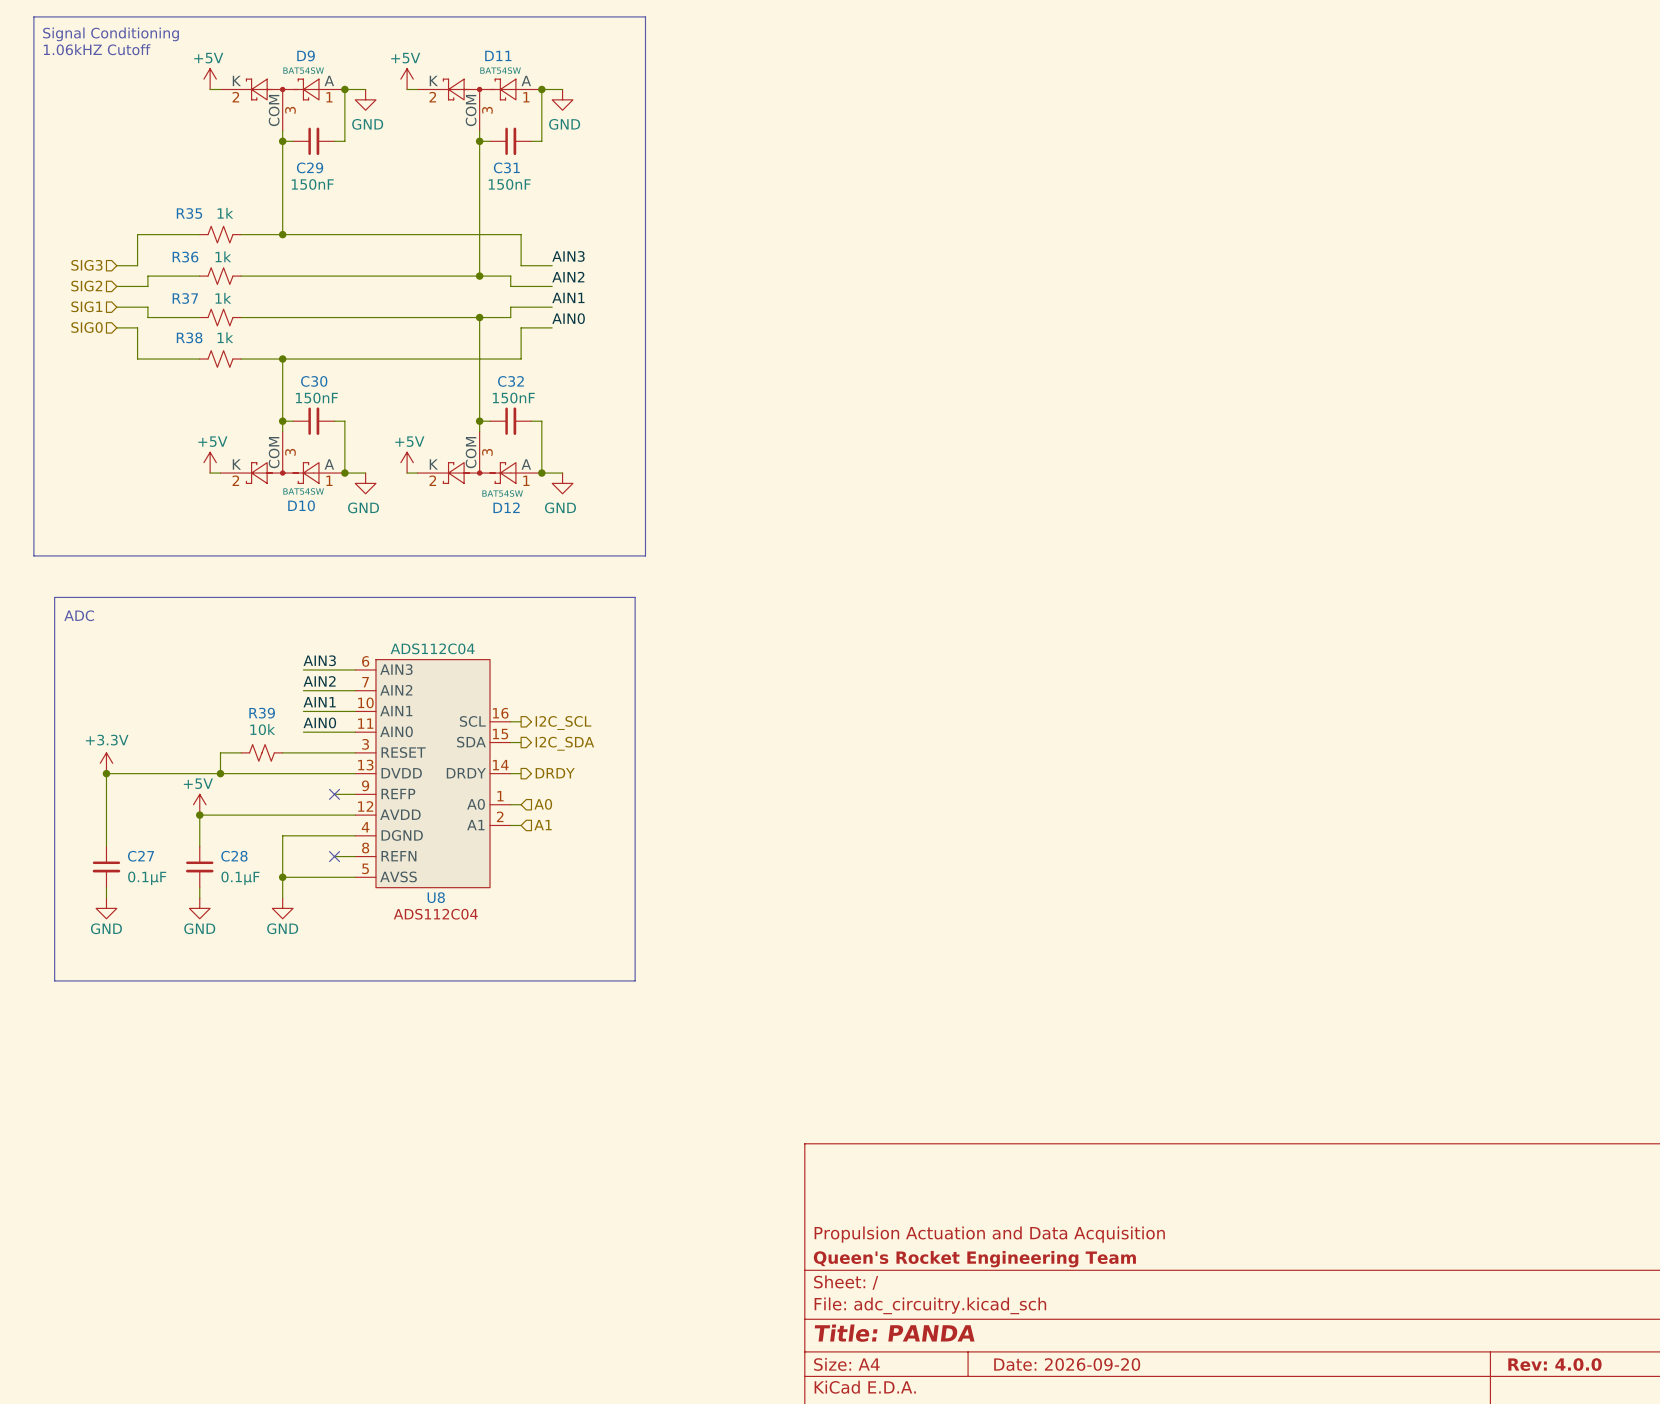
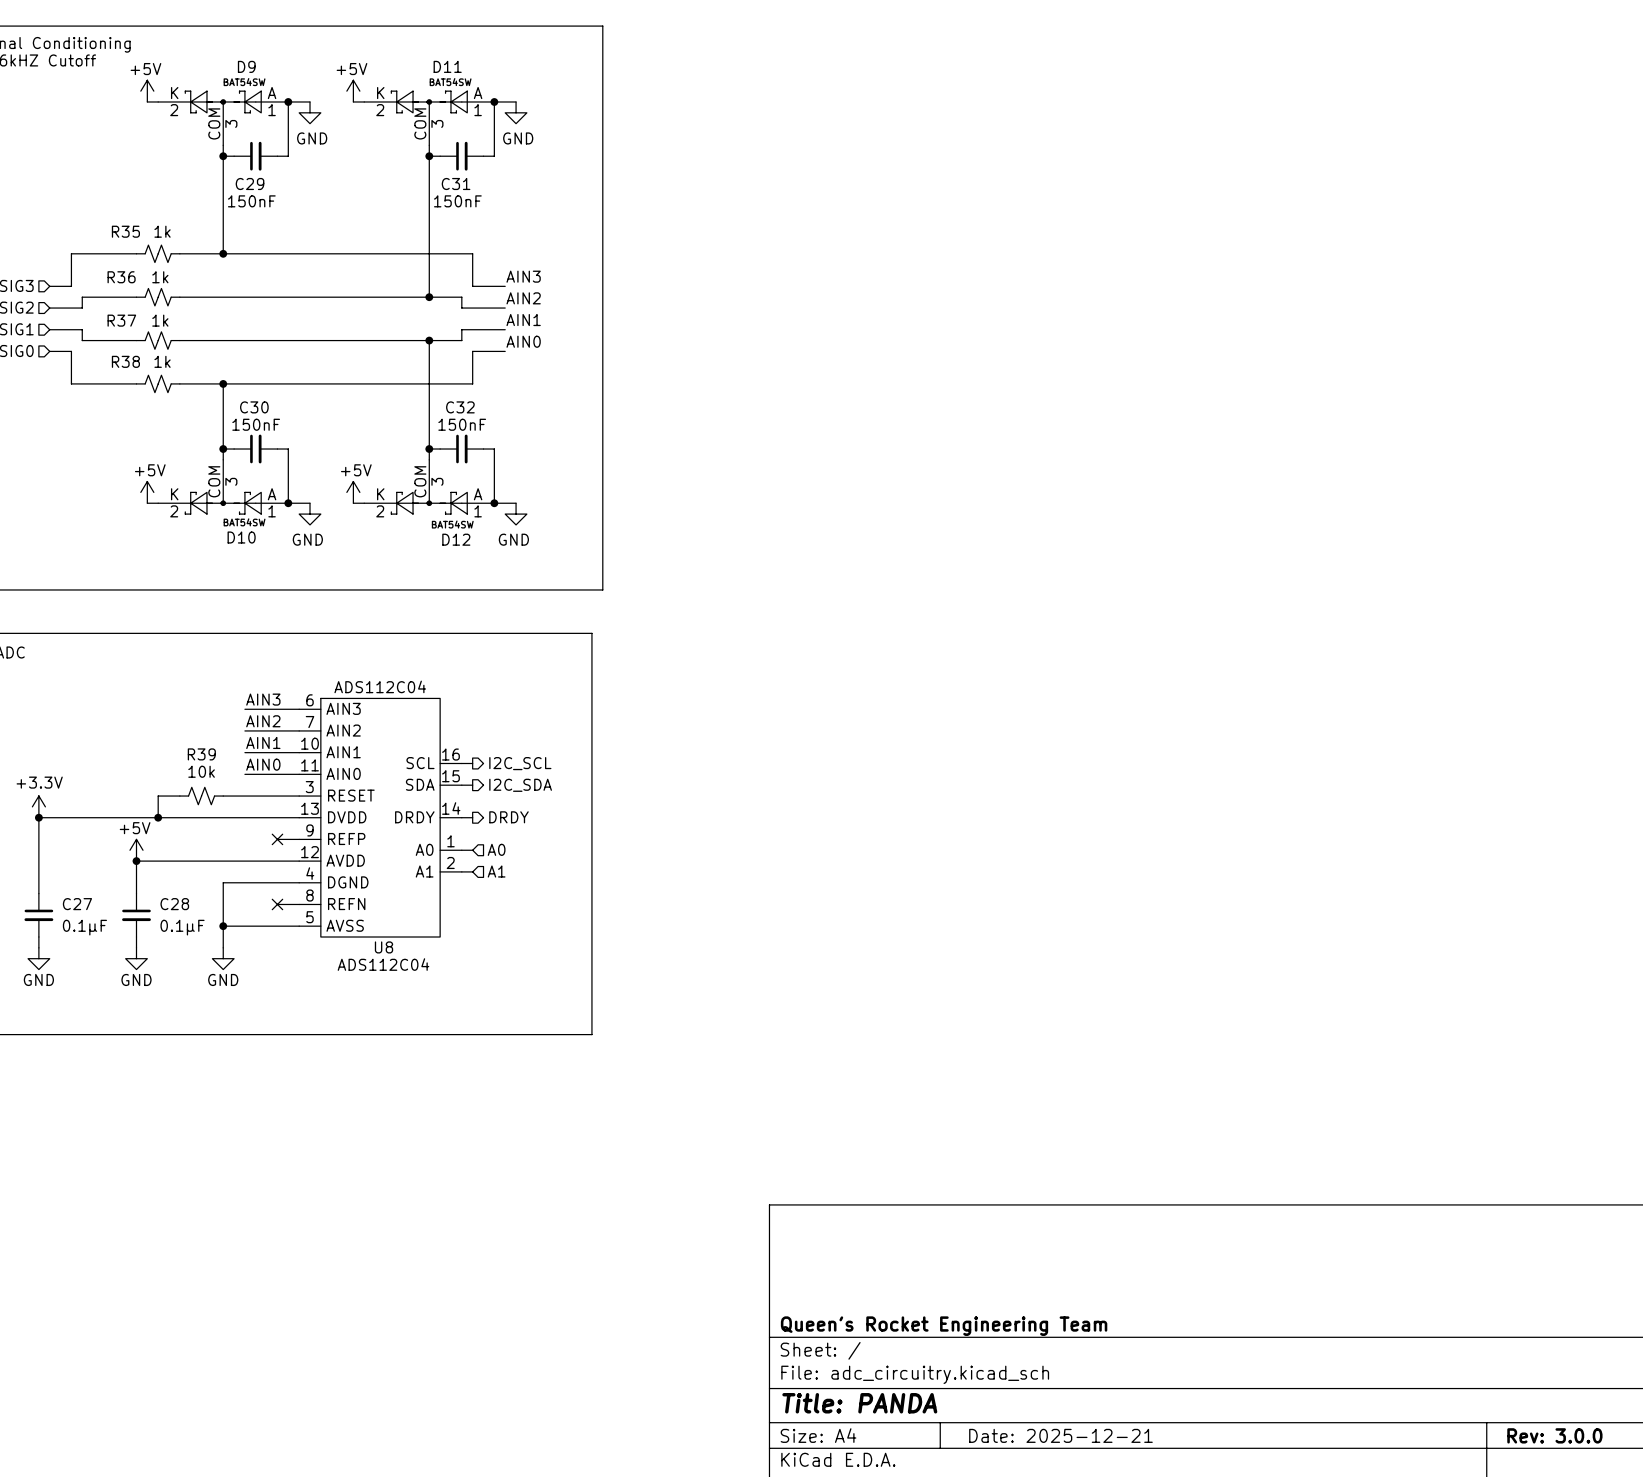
title block: Propulsion Actuation and Data Acquisition (989, 1234) -> none
title block: Date: 2026-09-20 (1067, 1364) -> Date: 2025-12-21 (1060, 1435)
title block: Rev: 4.0.0 (1554, 1364) -> Rev: 3.0.0 (1554, 1435)

